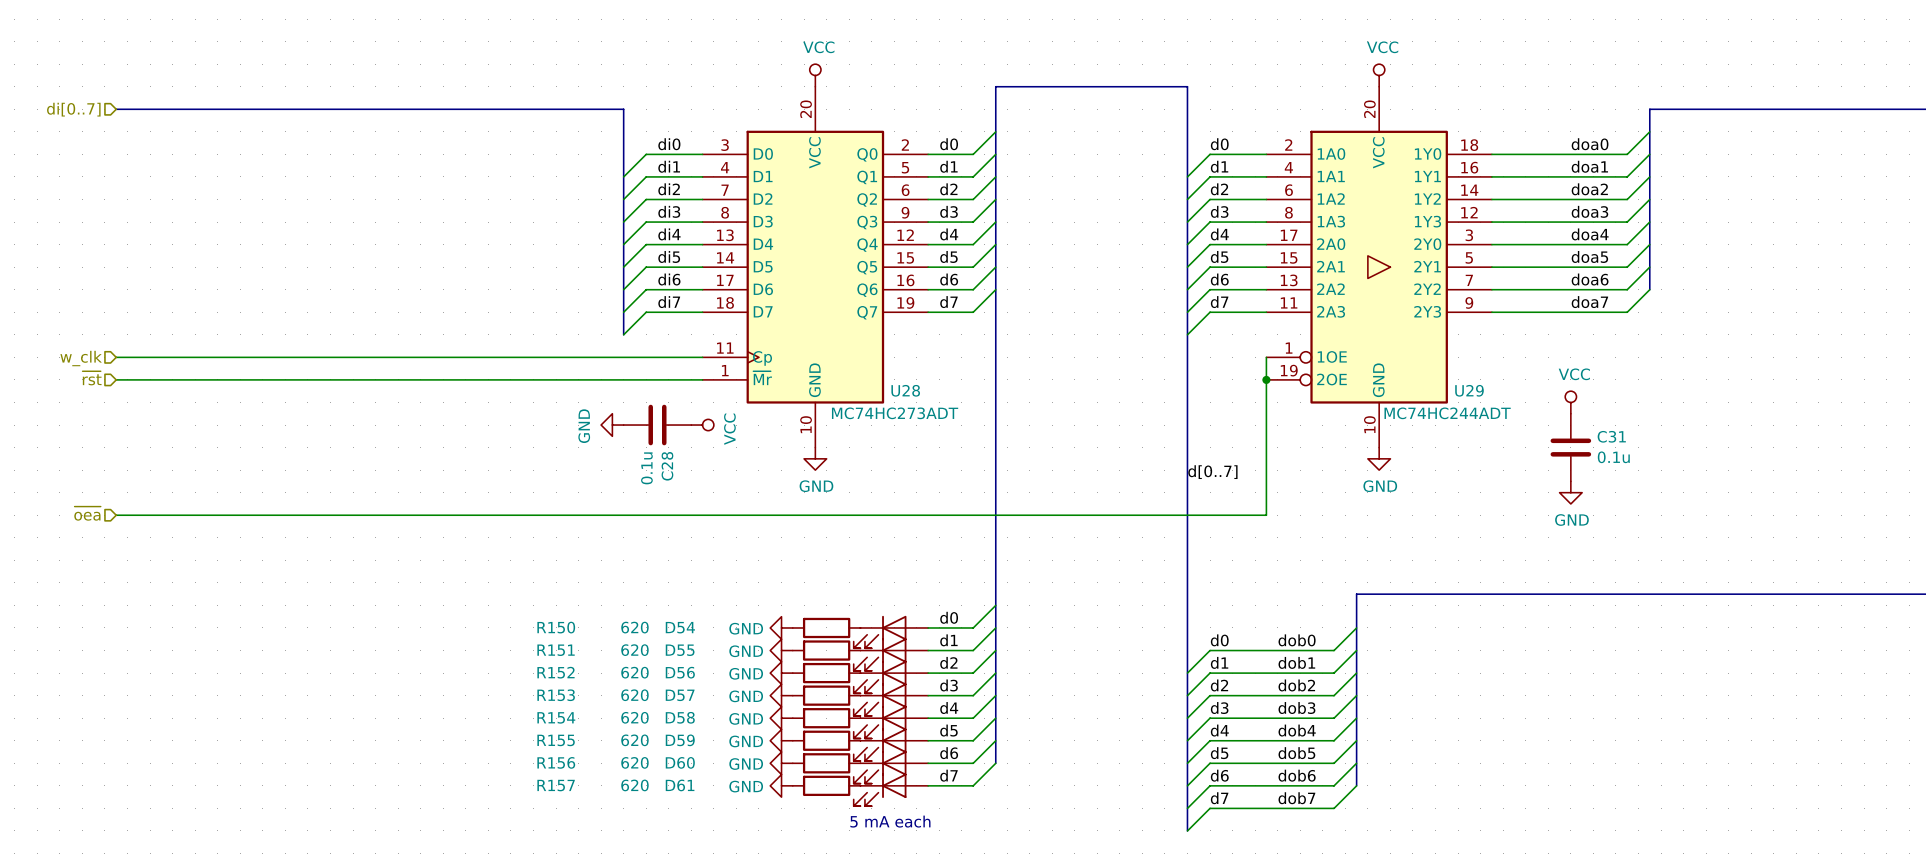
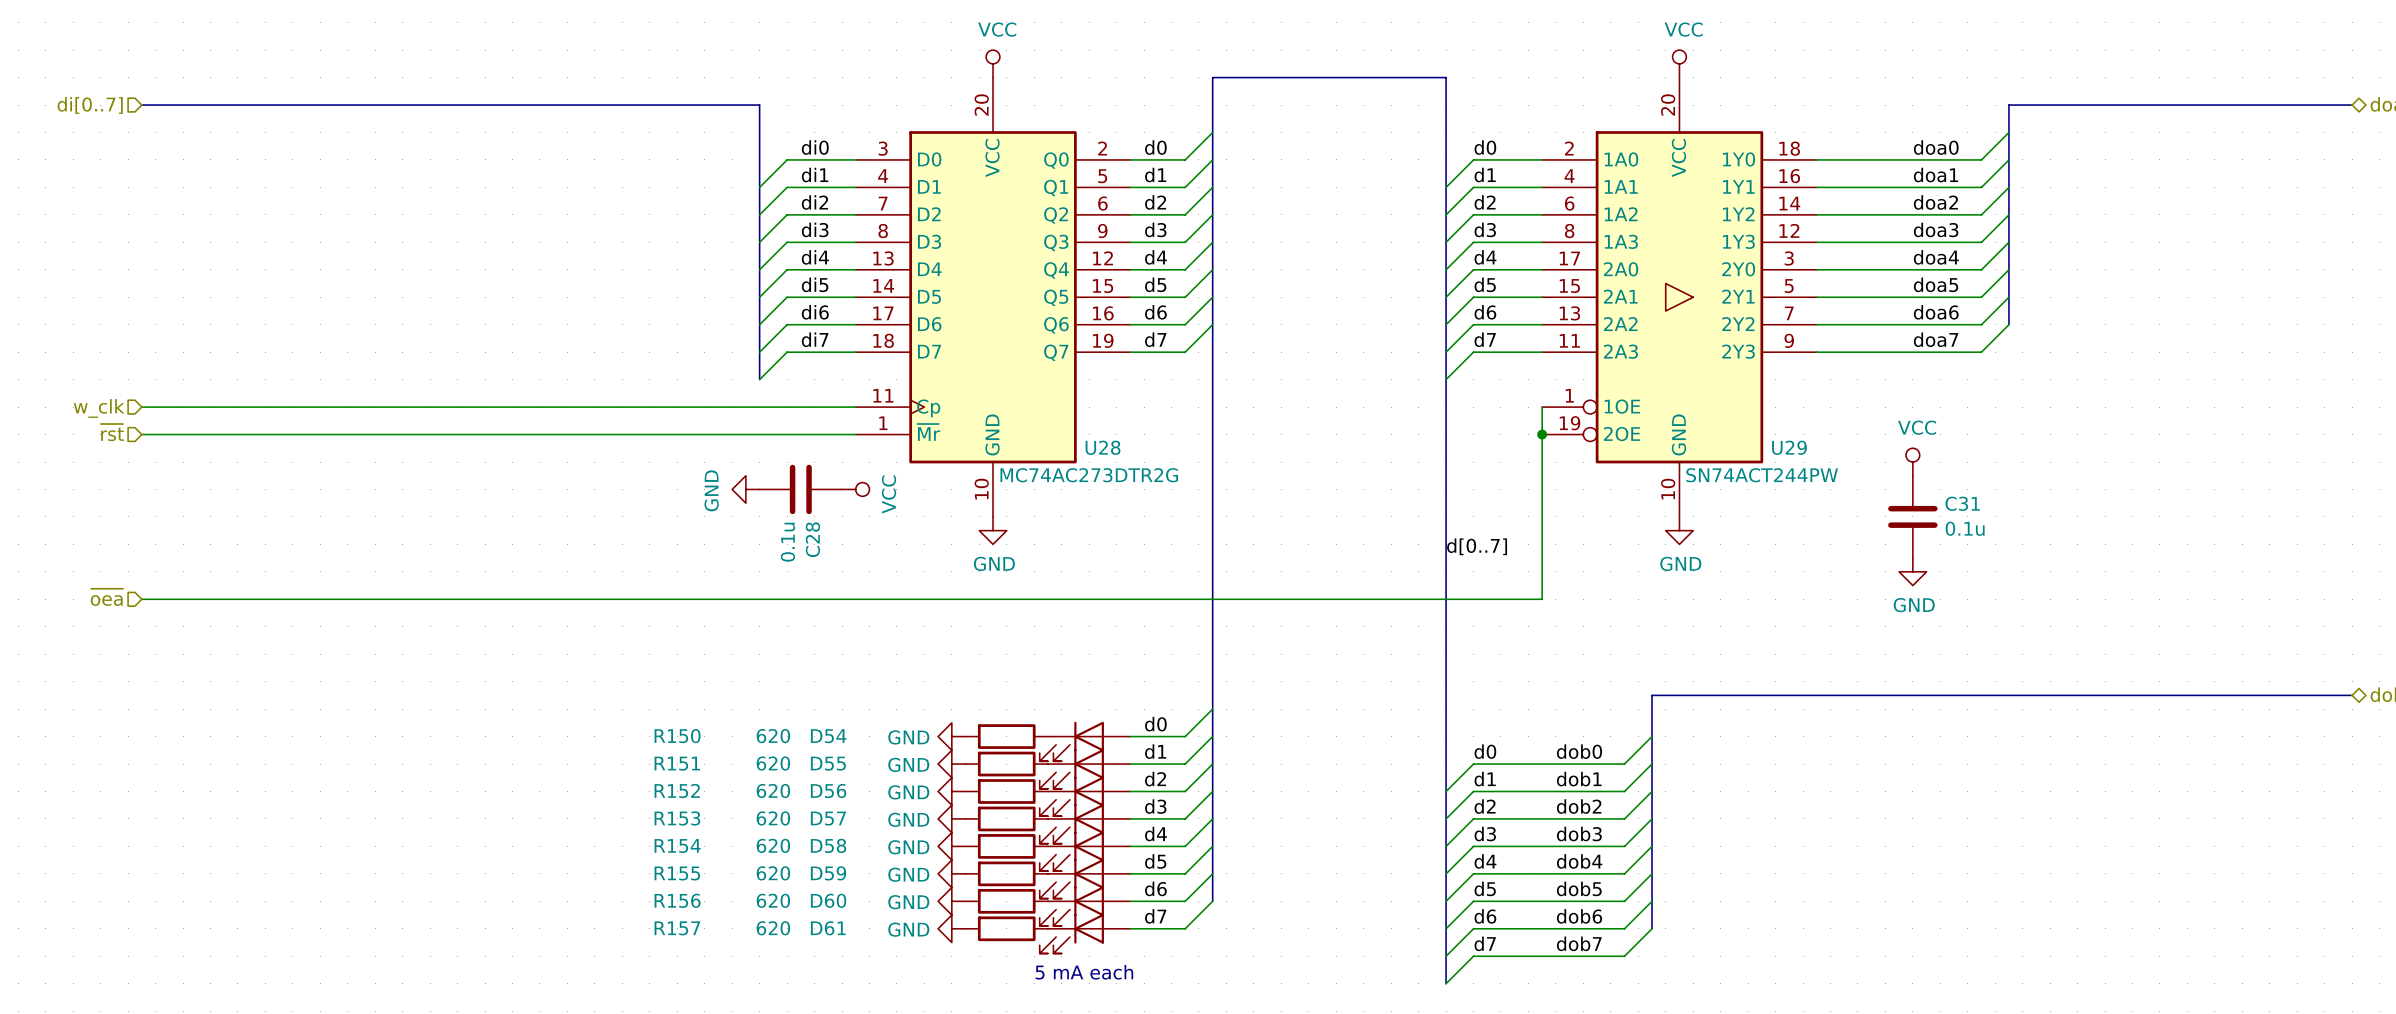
U28 value: MC74HC273ADT (895, 413) -> MC74AC273DTR2G (1089, 475)
U29 value: MC74HC244ADT (1447, 413) -> SN74ACT244PW (1762, 475)

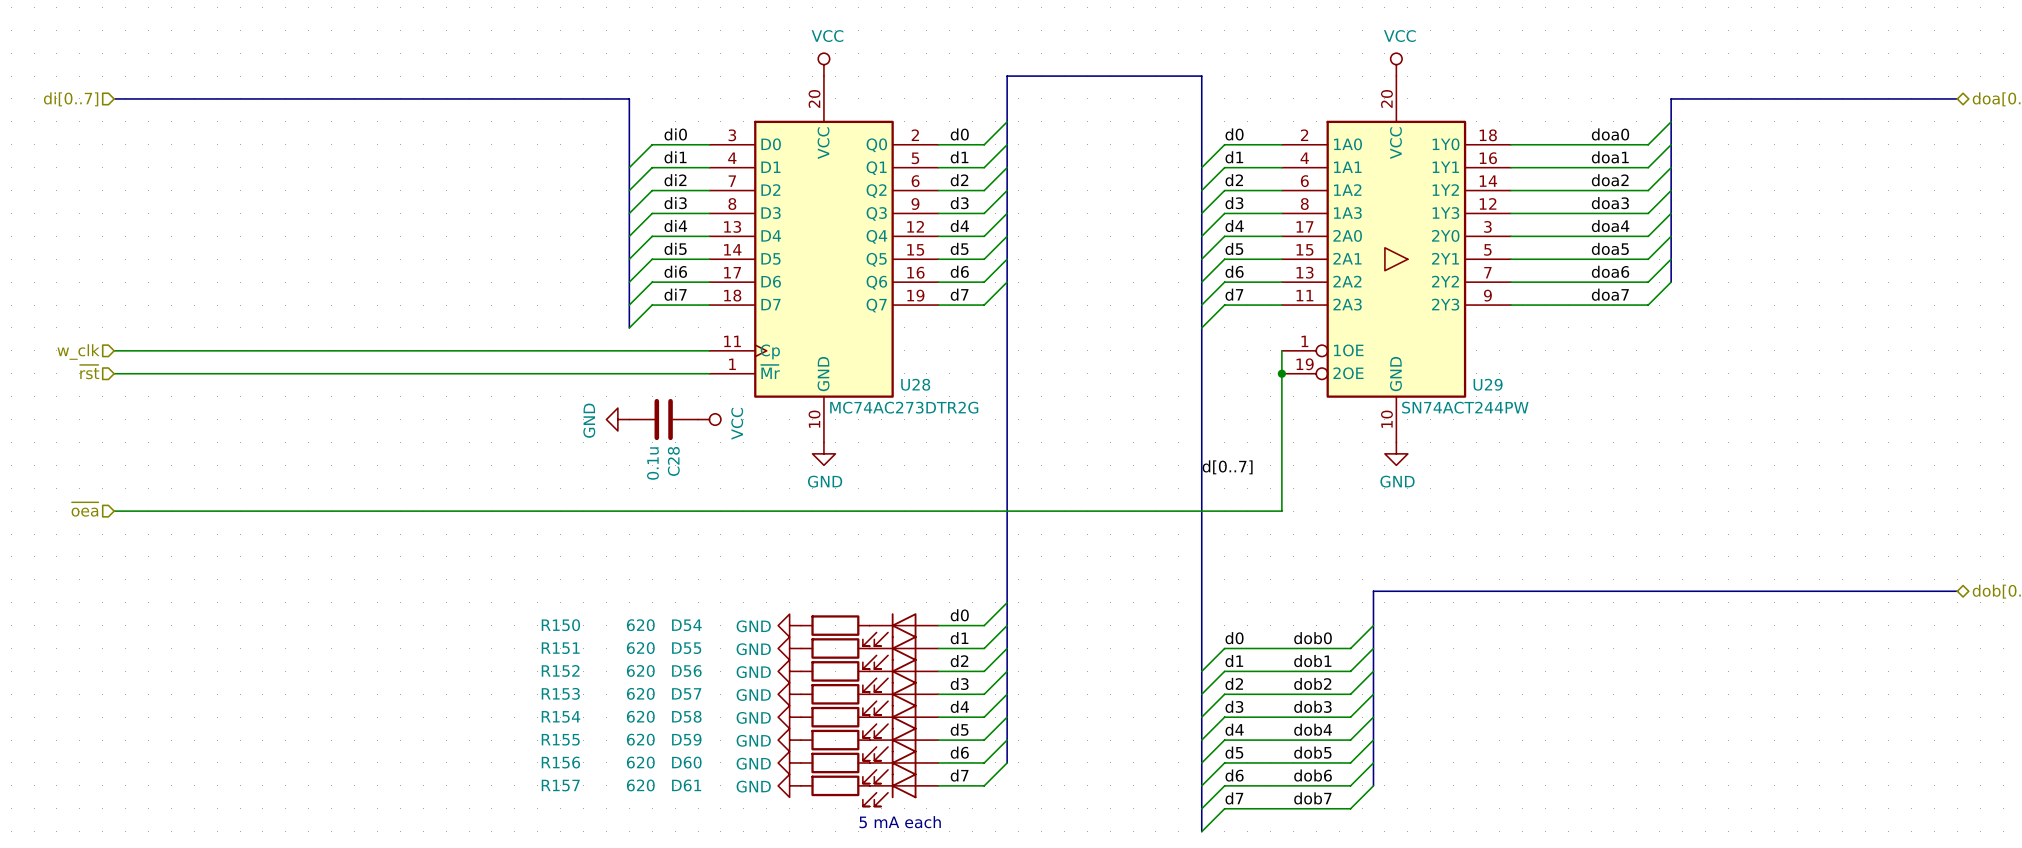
power symbol: VCC (1912, 462) -> none
C31: 0.1u (1912, 516) -> none
power symbol: GND (1912, 571) -> none

